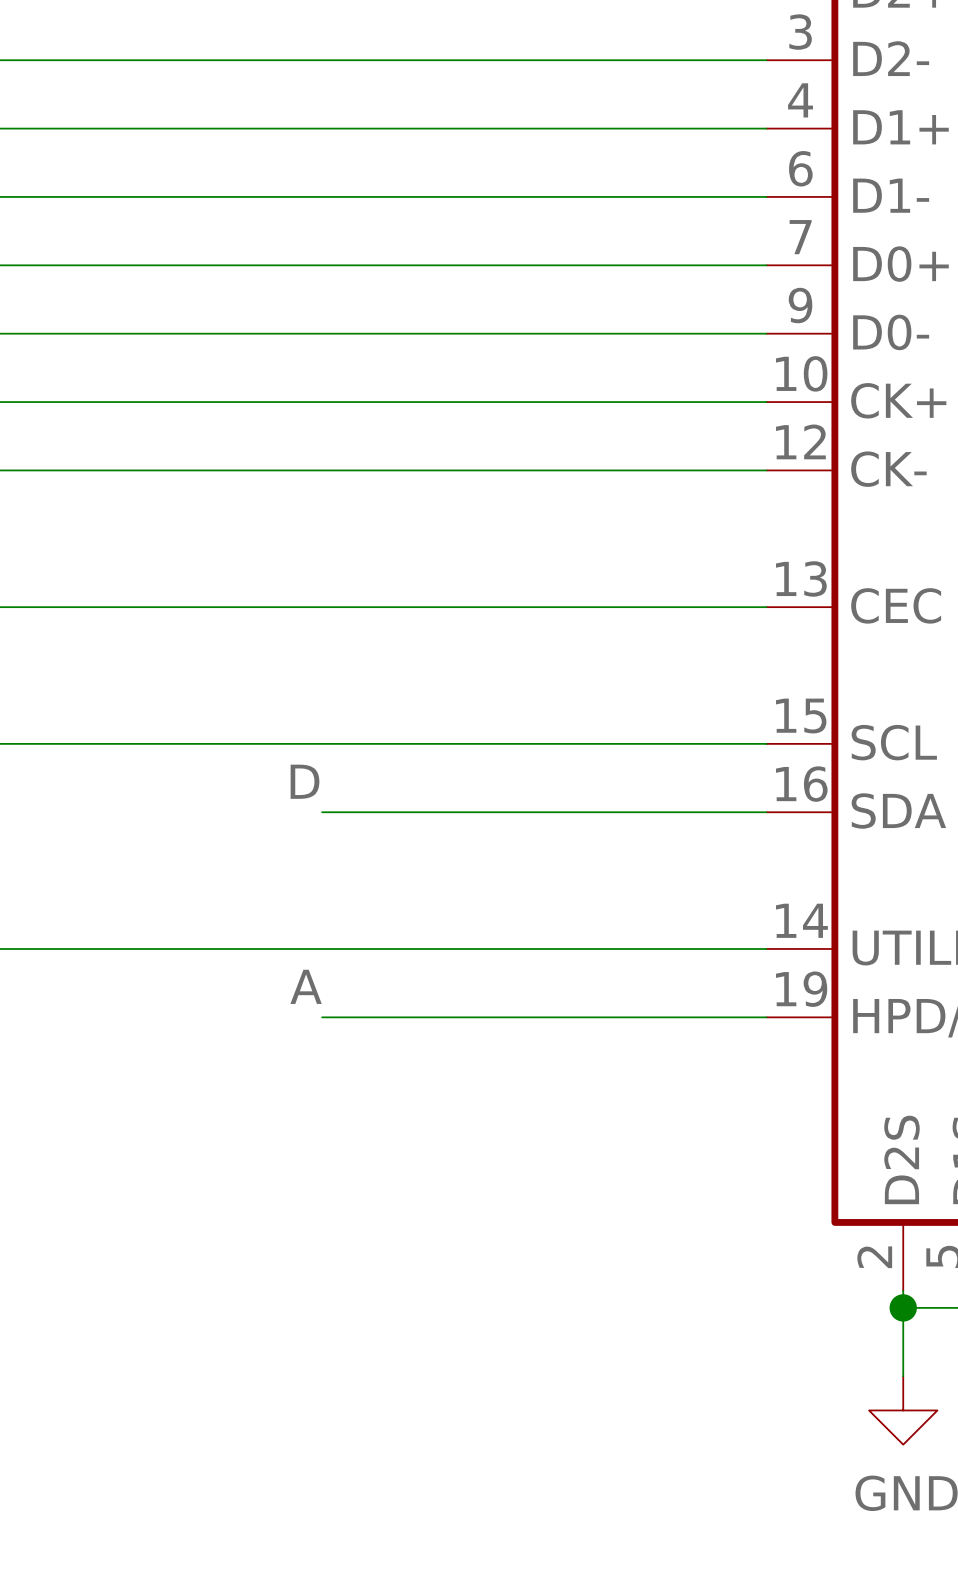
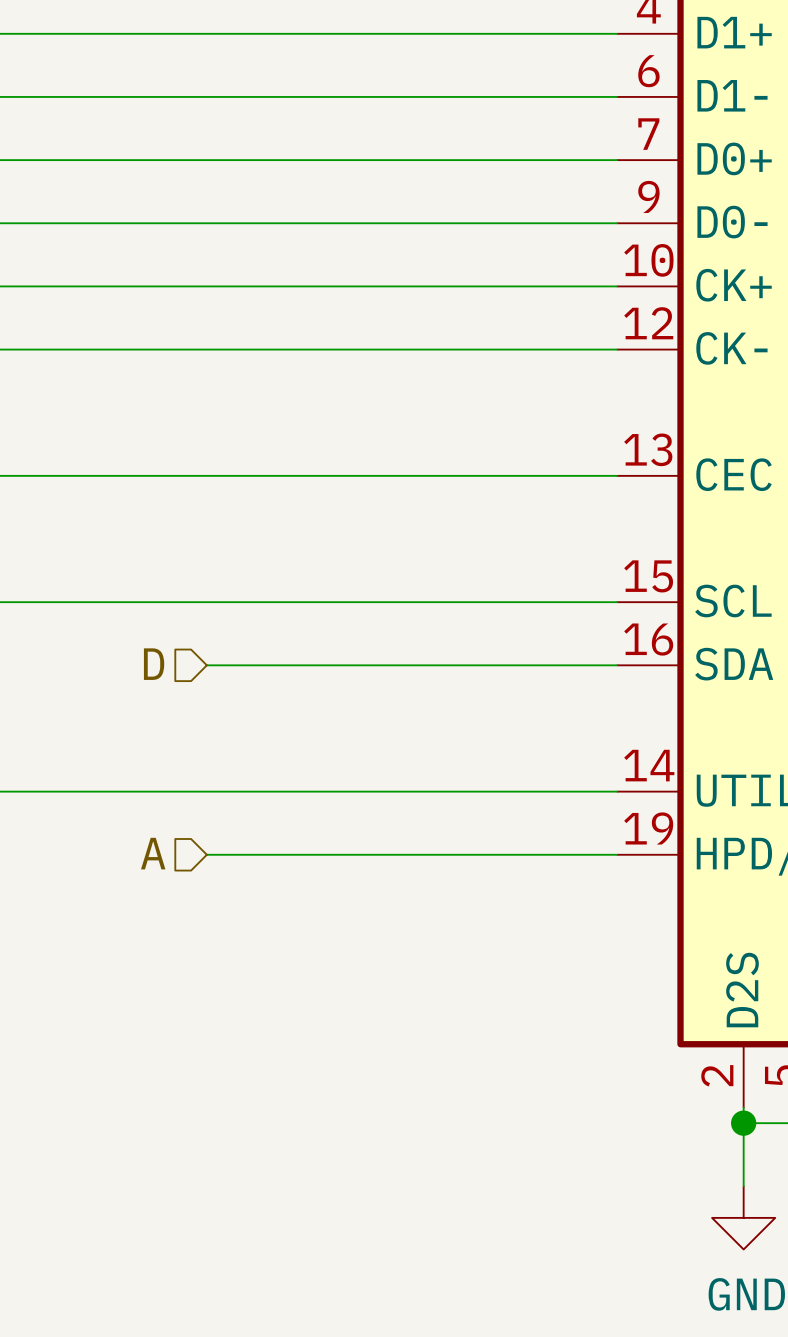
label: D (304, 781) -> none
hierarchical label: none -> D (154, 664)
label: A (306, 986) -> none
hierarchical label: none -> A (153, 853)

